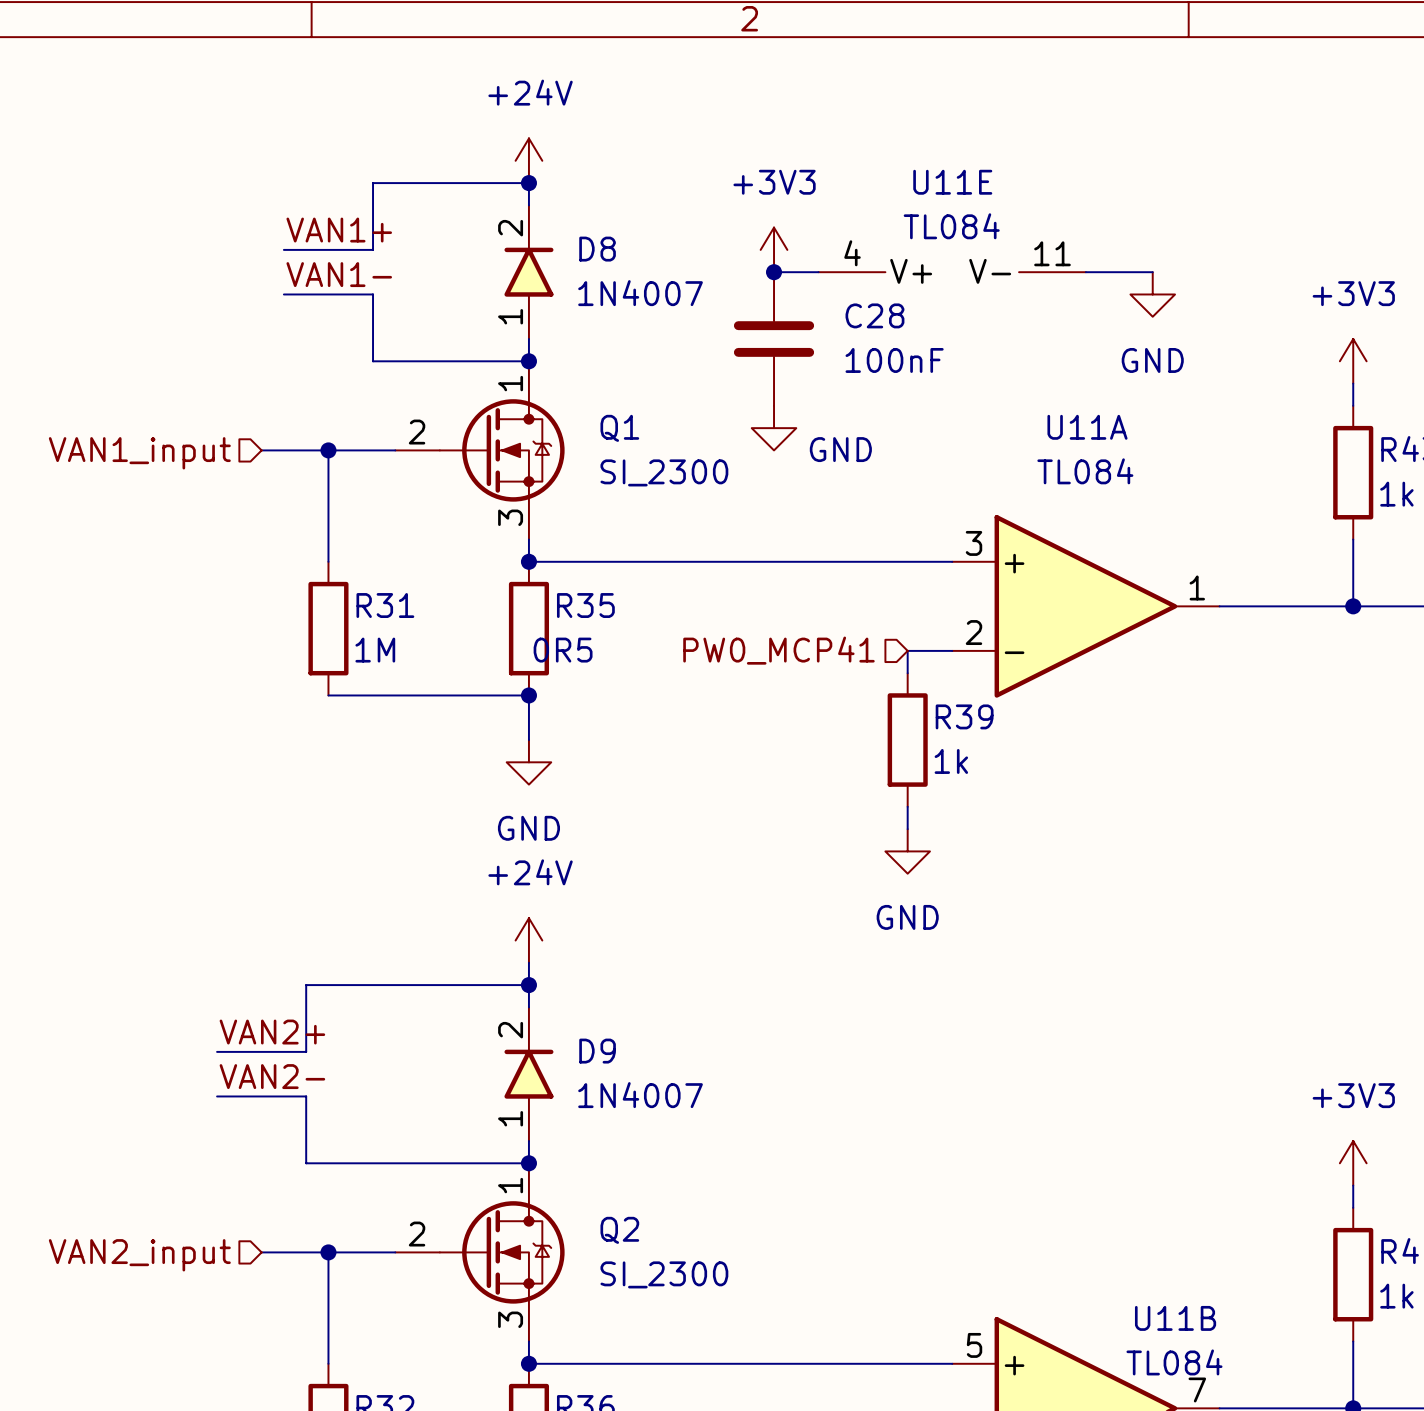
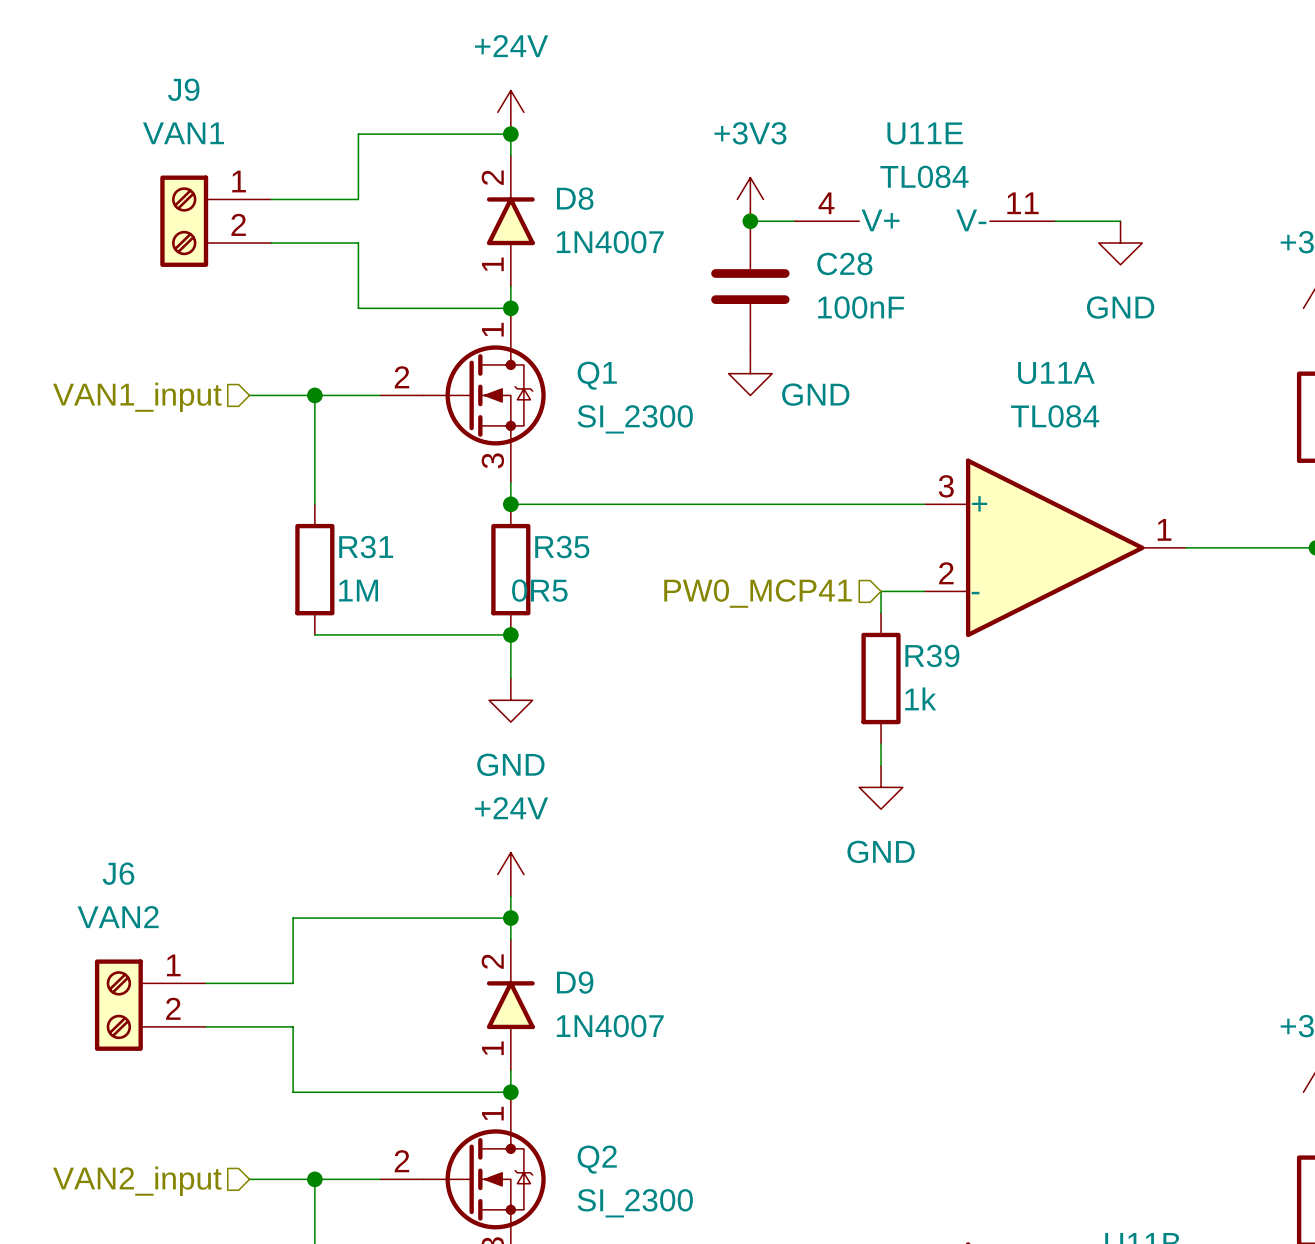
label: VAN1+ (339, 230) -> none
J9: none -> VAN1 (215, 221)
label: VAN1- (339, 274) -> none
label: VAN2+ (272, 1032) -> none
J6: none -> VAN2 (150, 1005)
label: VAN2- (272, 1076) -> none

